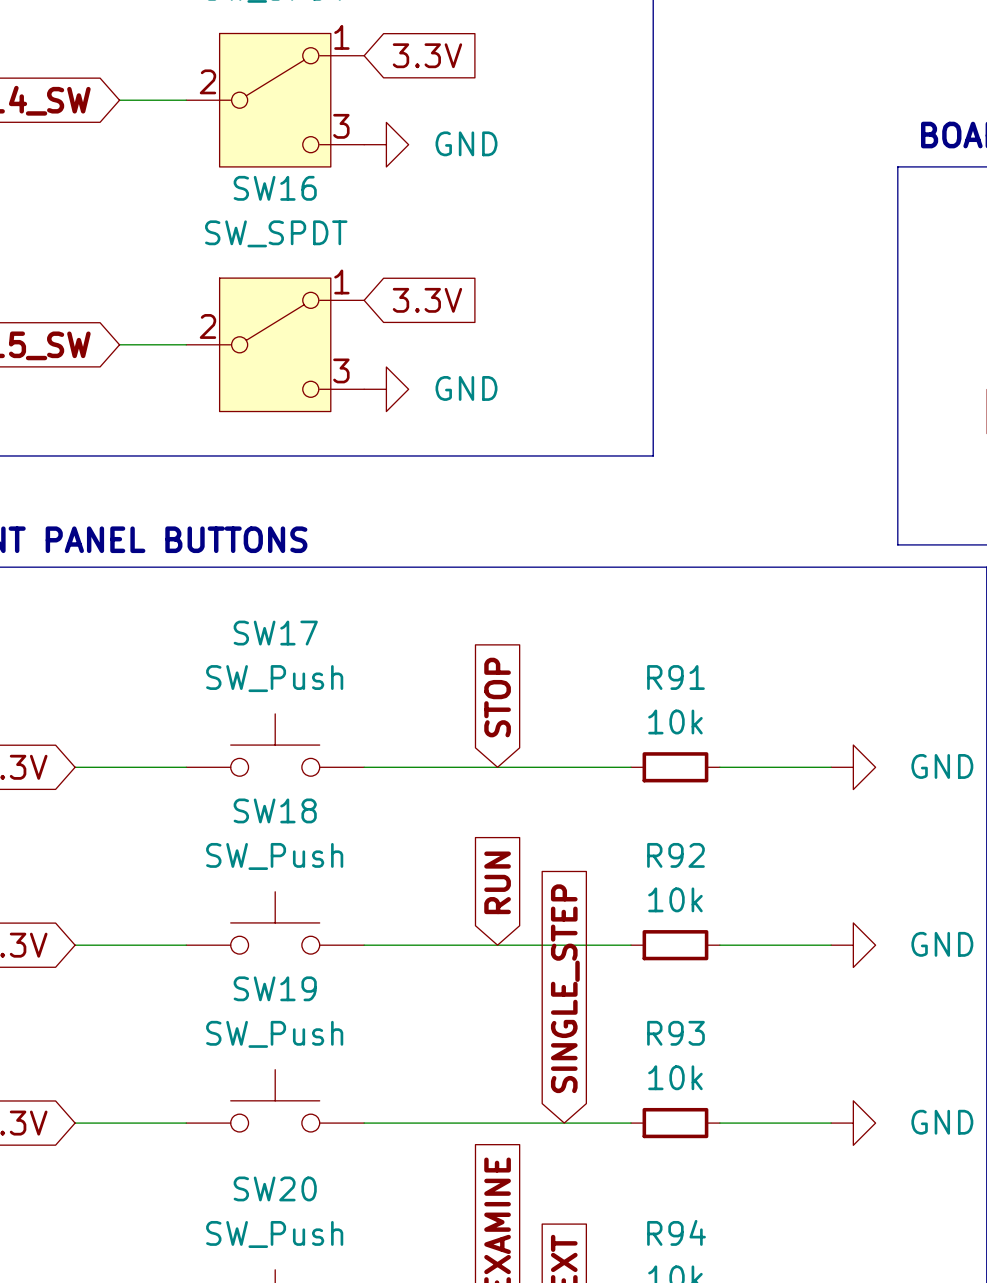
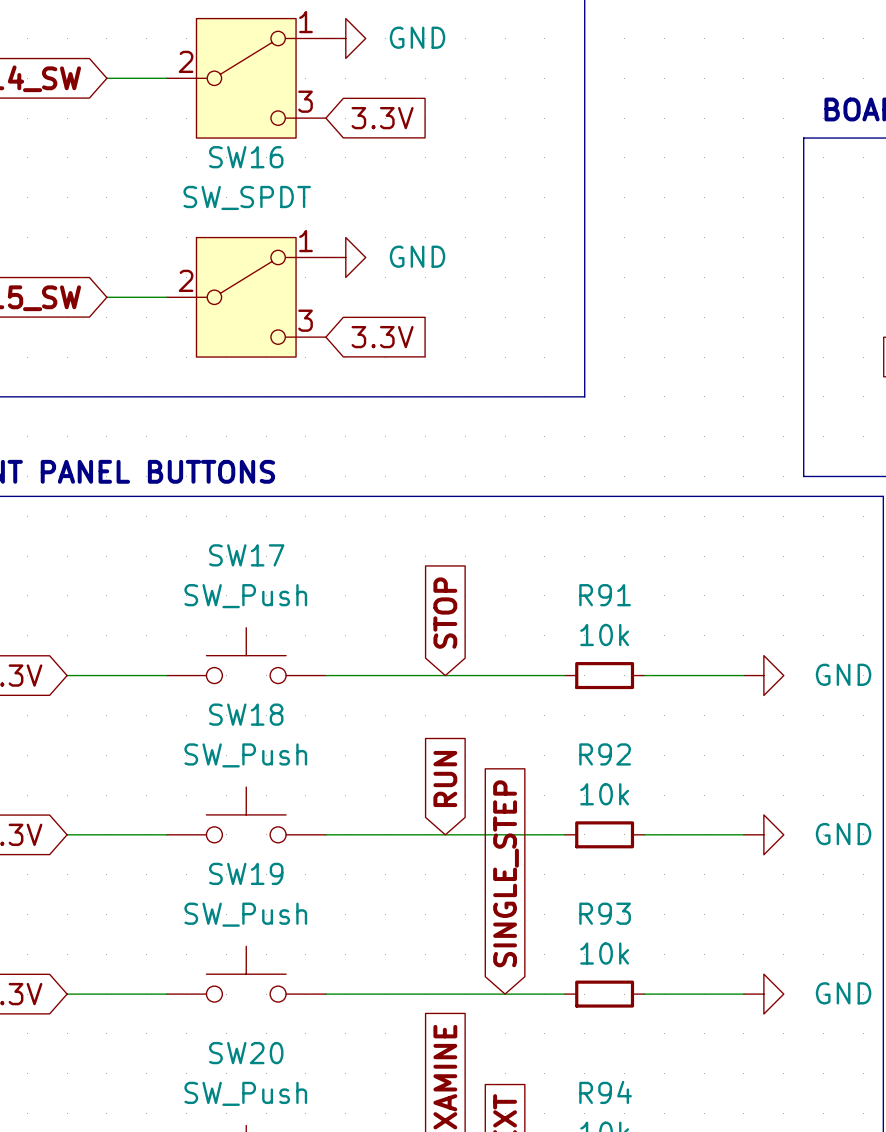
power symbol: none -> GND (345, 38)
global label: 3.3V (427, 55) -> none
power symbol: GND (386, 144) -> none
global label: none -> 3.3V (382, 118)
power symbol: none -> GND (345, 257)
global label: 3.3V (427, 300) -> none
power symbol: GND (386, 389) -> none
global label: none -> 3.3V (382, 337)

